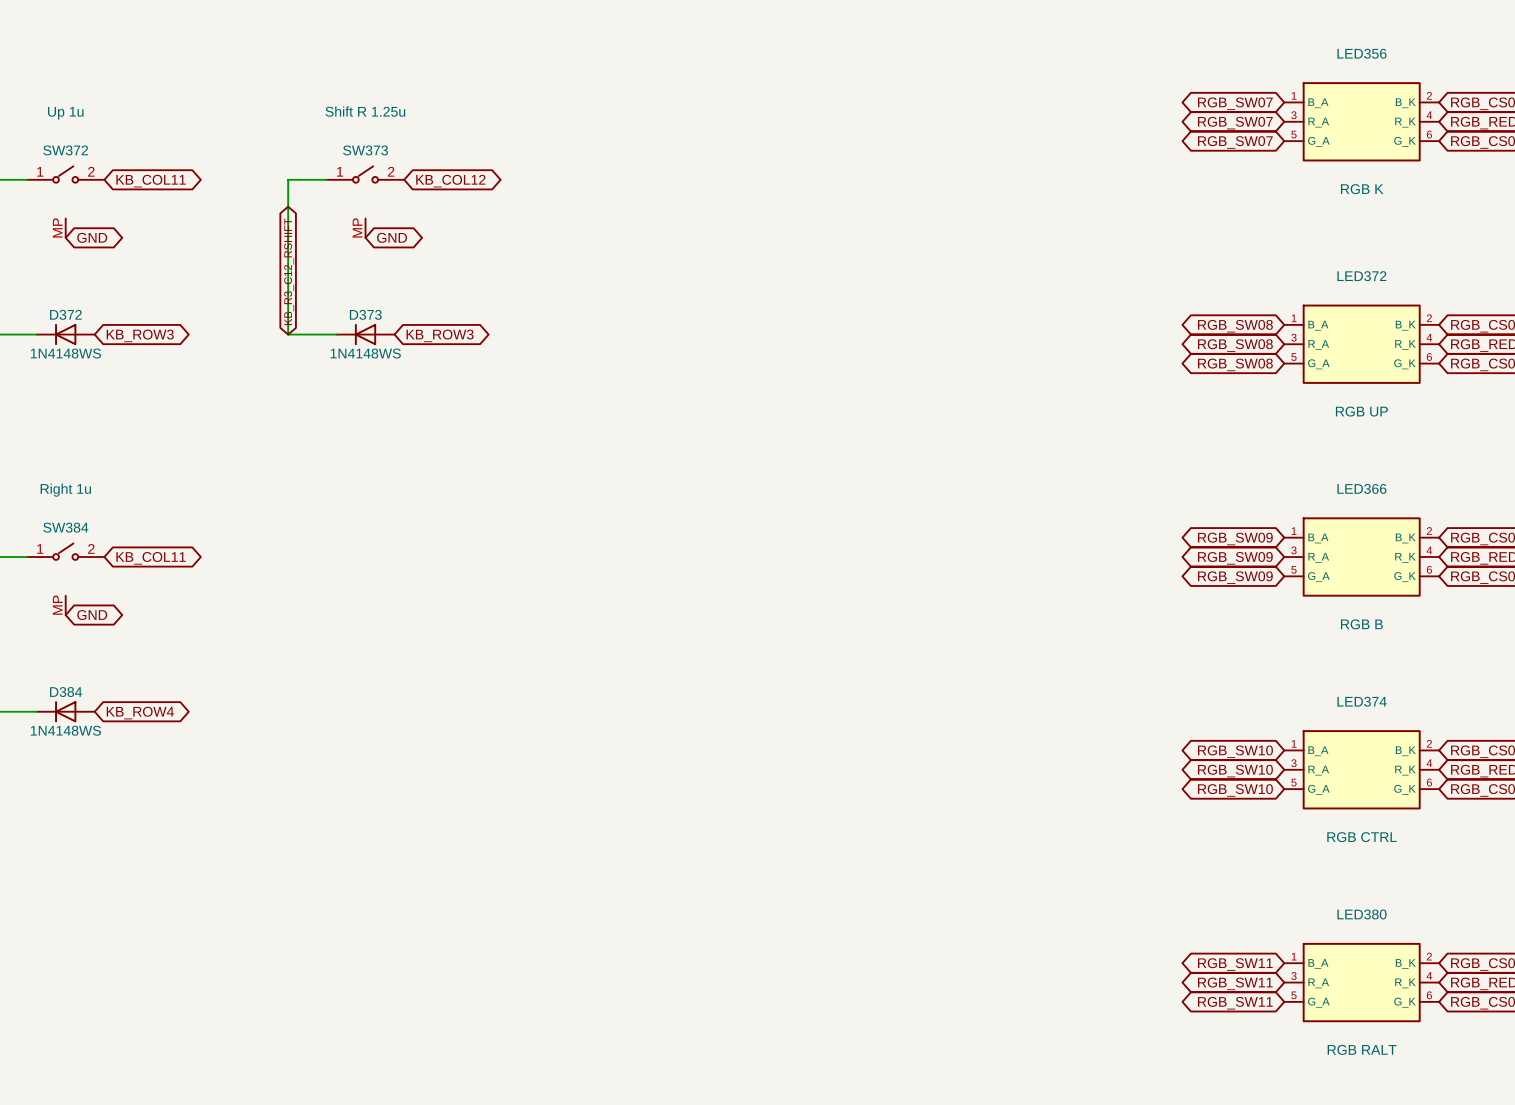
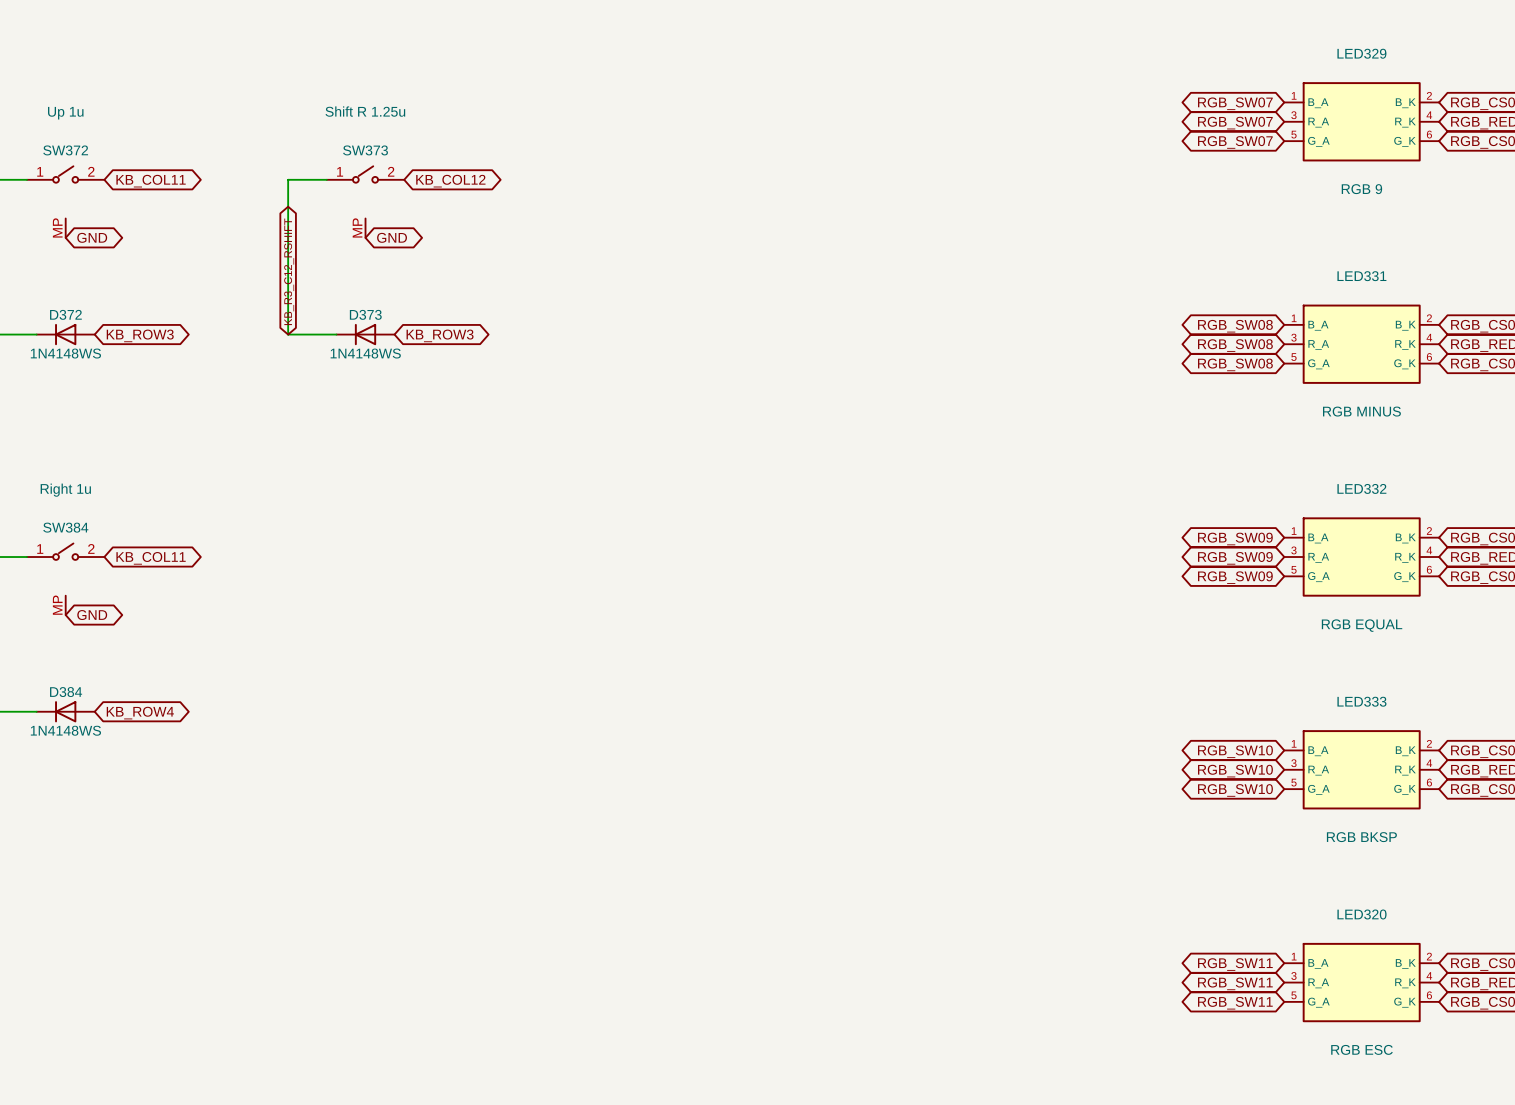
LED356 name: LED356 (1361, 53) -> LED329 (1361, 53)
LED356 value: RGB K (1362, 189) -> RGB 9 (1361, 189)
LED372 name: LED372 (1361, 276) -> LED331 (1361, 276)
LED372 value: RGB UP (1361, 411) -> RGB MINUS (1361, 411)
LED366 name: LED366 (1361, 488) -> LED332 (1361, 488)
LED366 value: RGB B (1361, 624) -> RGB EQUAL (1362, 625)
LED374 name: LED374 (1362, 701) -> LED333 (1361, 701)
LED374 value: RGB CTRL (1362, 837) -> RGB BKSP (1361, 837)
LED380 name: LED380 (1361, 914) -> LED320 (1361, 914)
LED380 value: RGB RALT (1362, 1049) -> RGB ESC (1361, 1049)

